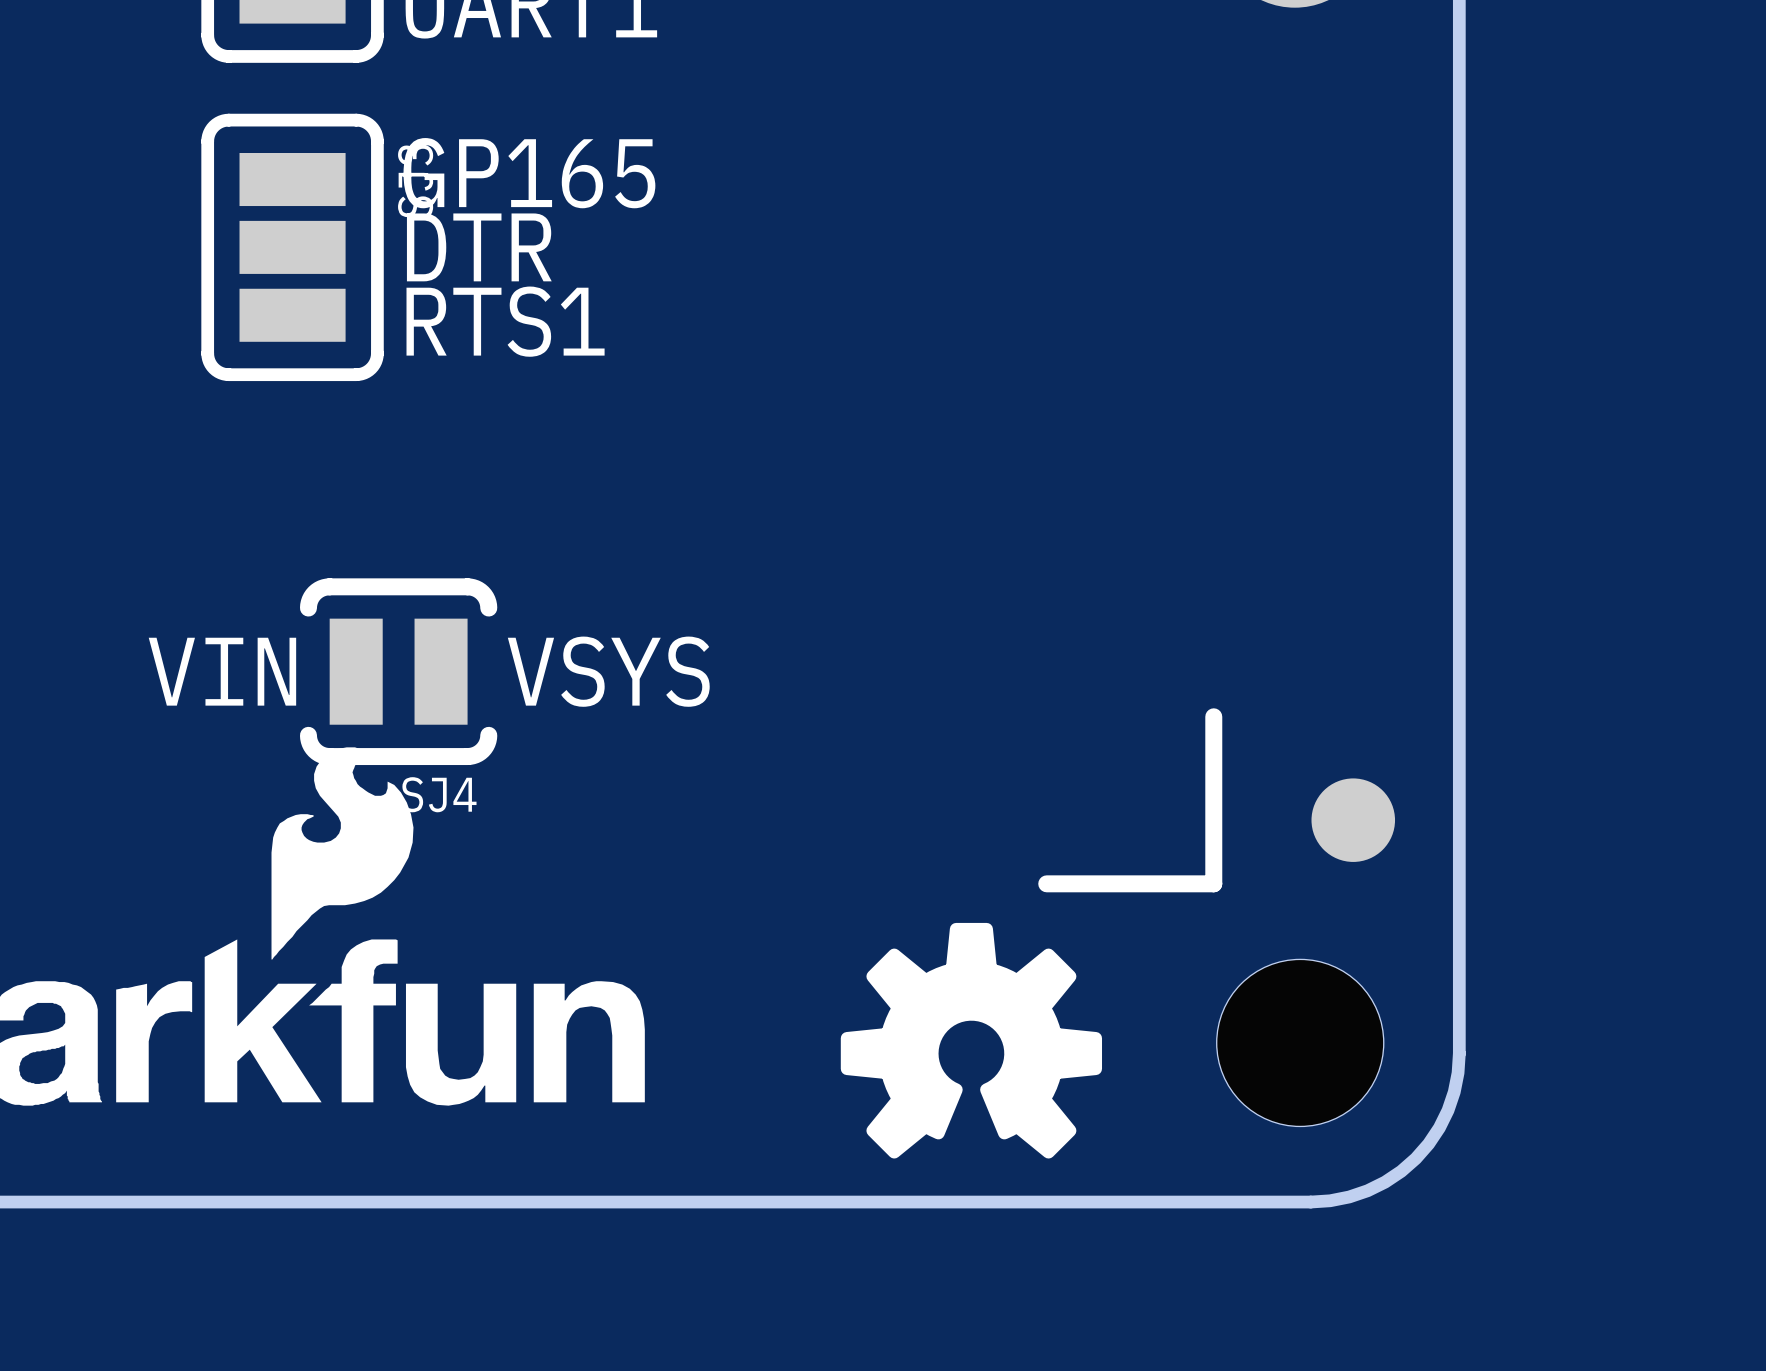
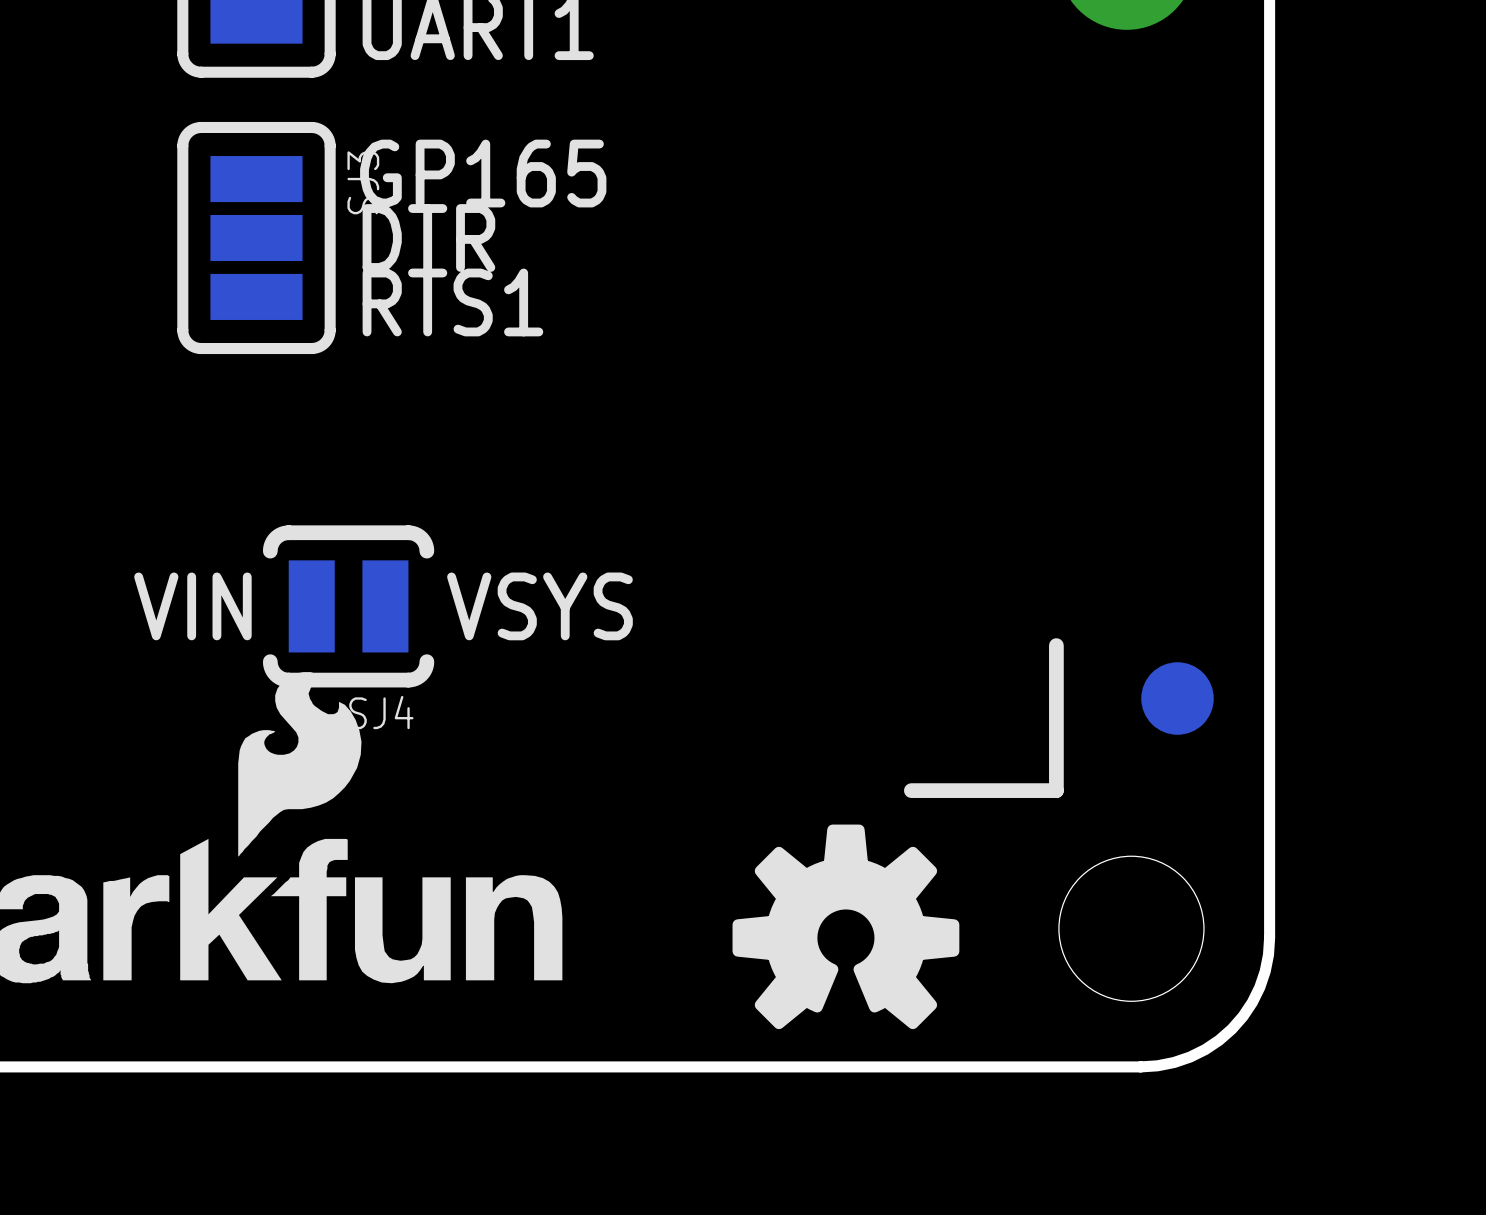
part position: (1353, 820) -> (1177, 698)

